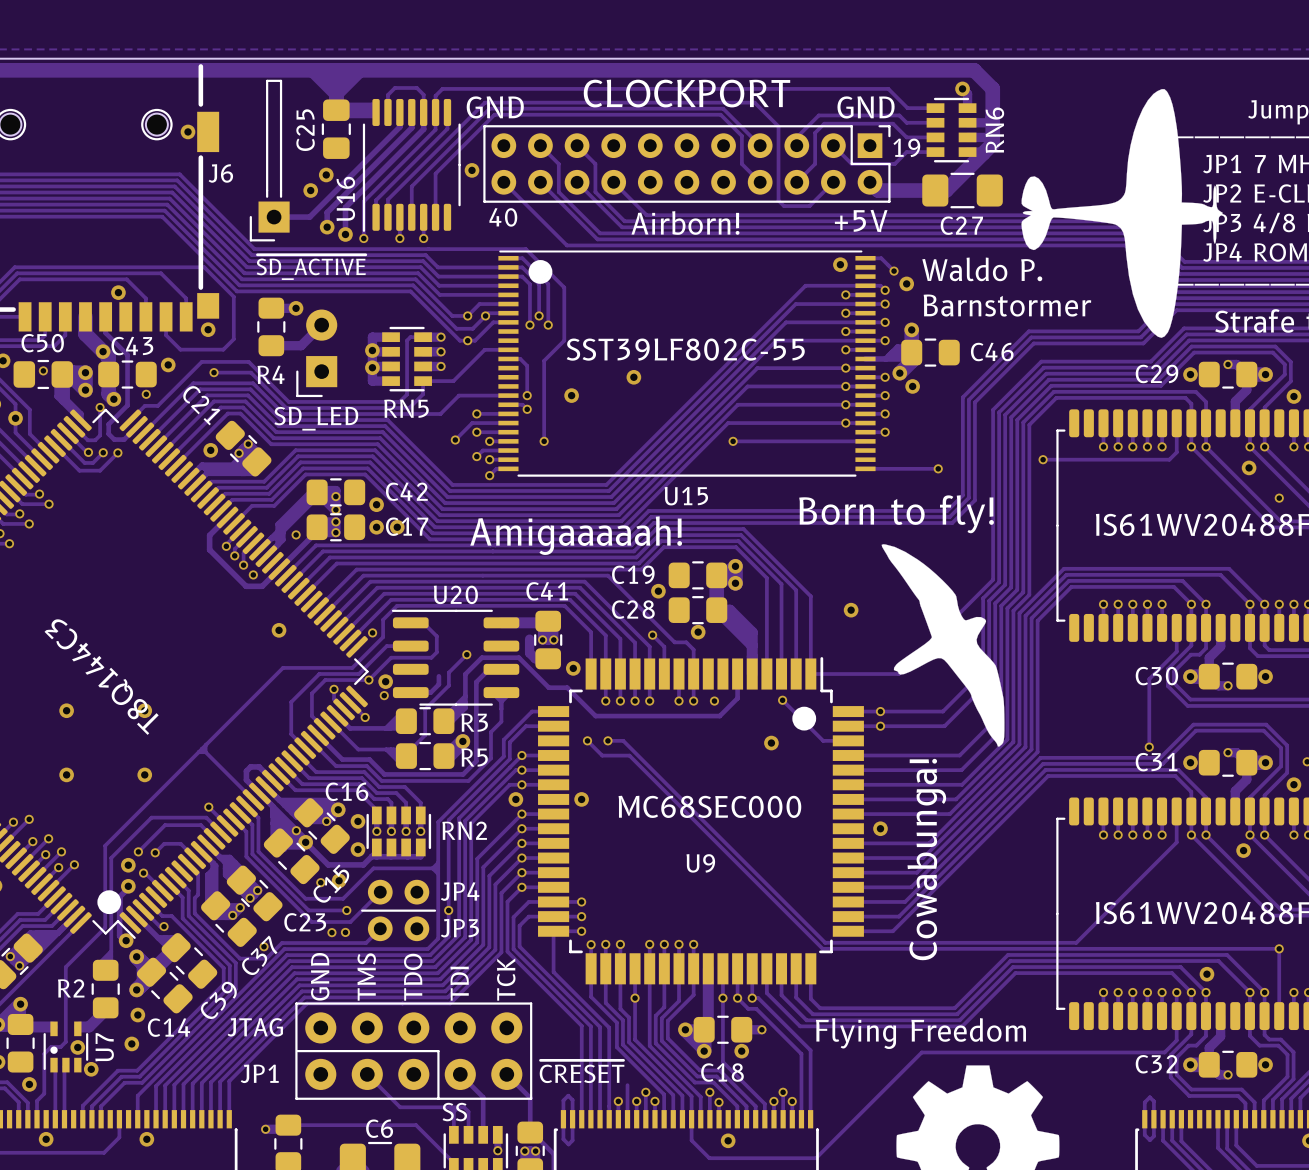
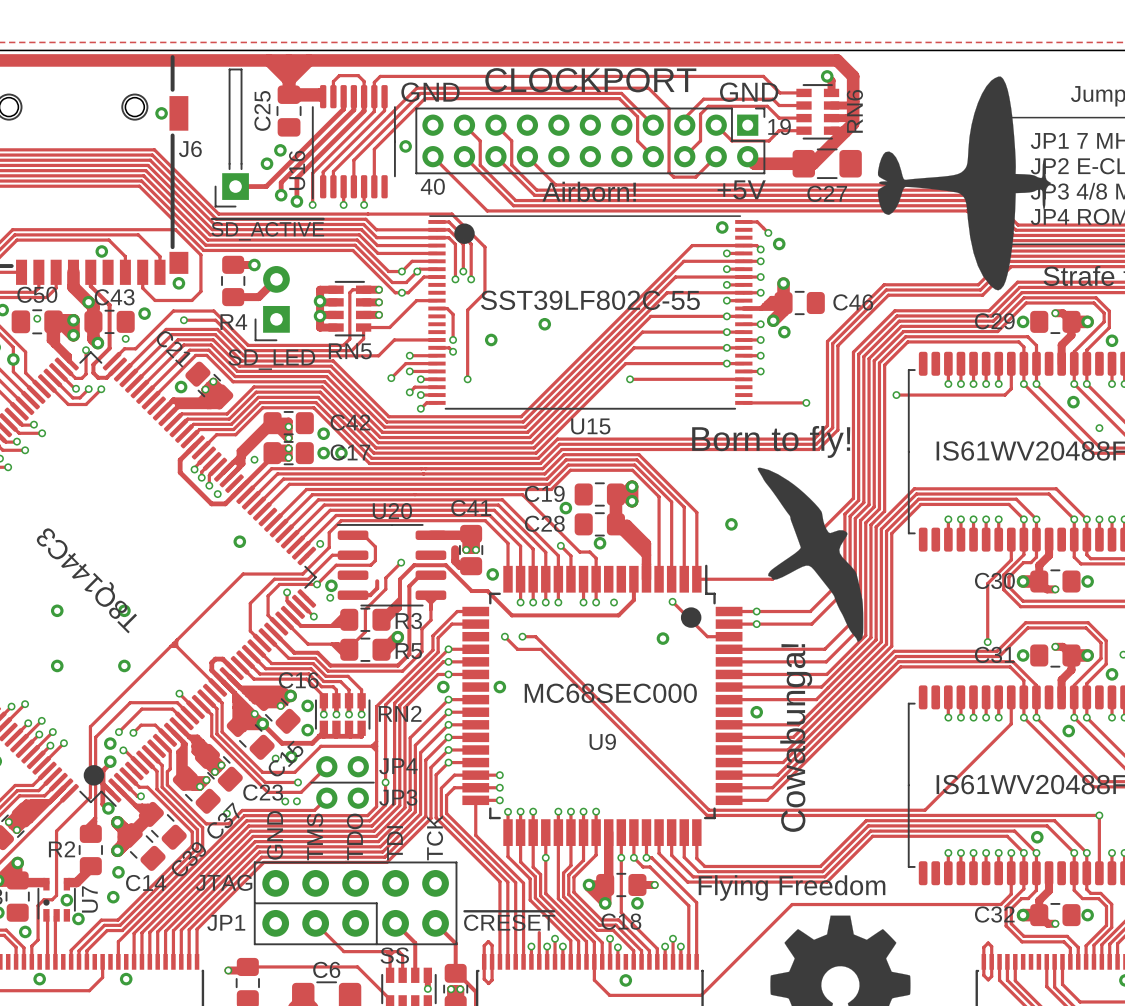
text: Waldo P. (982, 269) -> none
text: Barnstormer (1007, 305) -> none
text: Amigaaaaah! (576, 535) -> none

